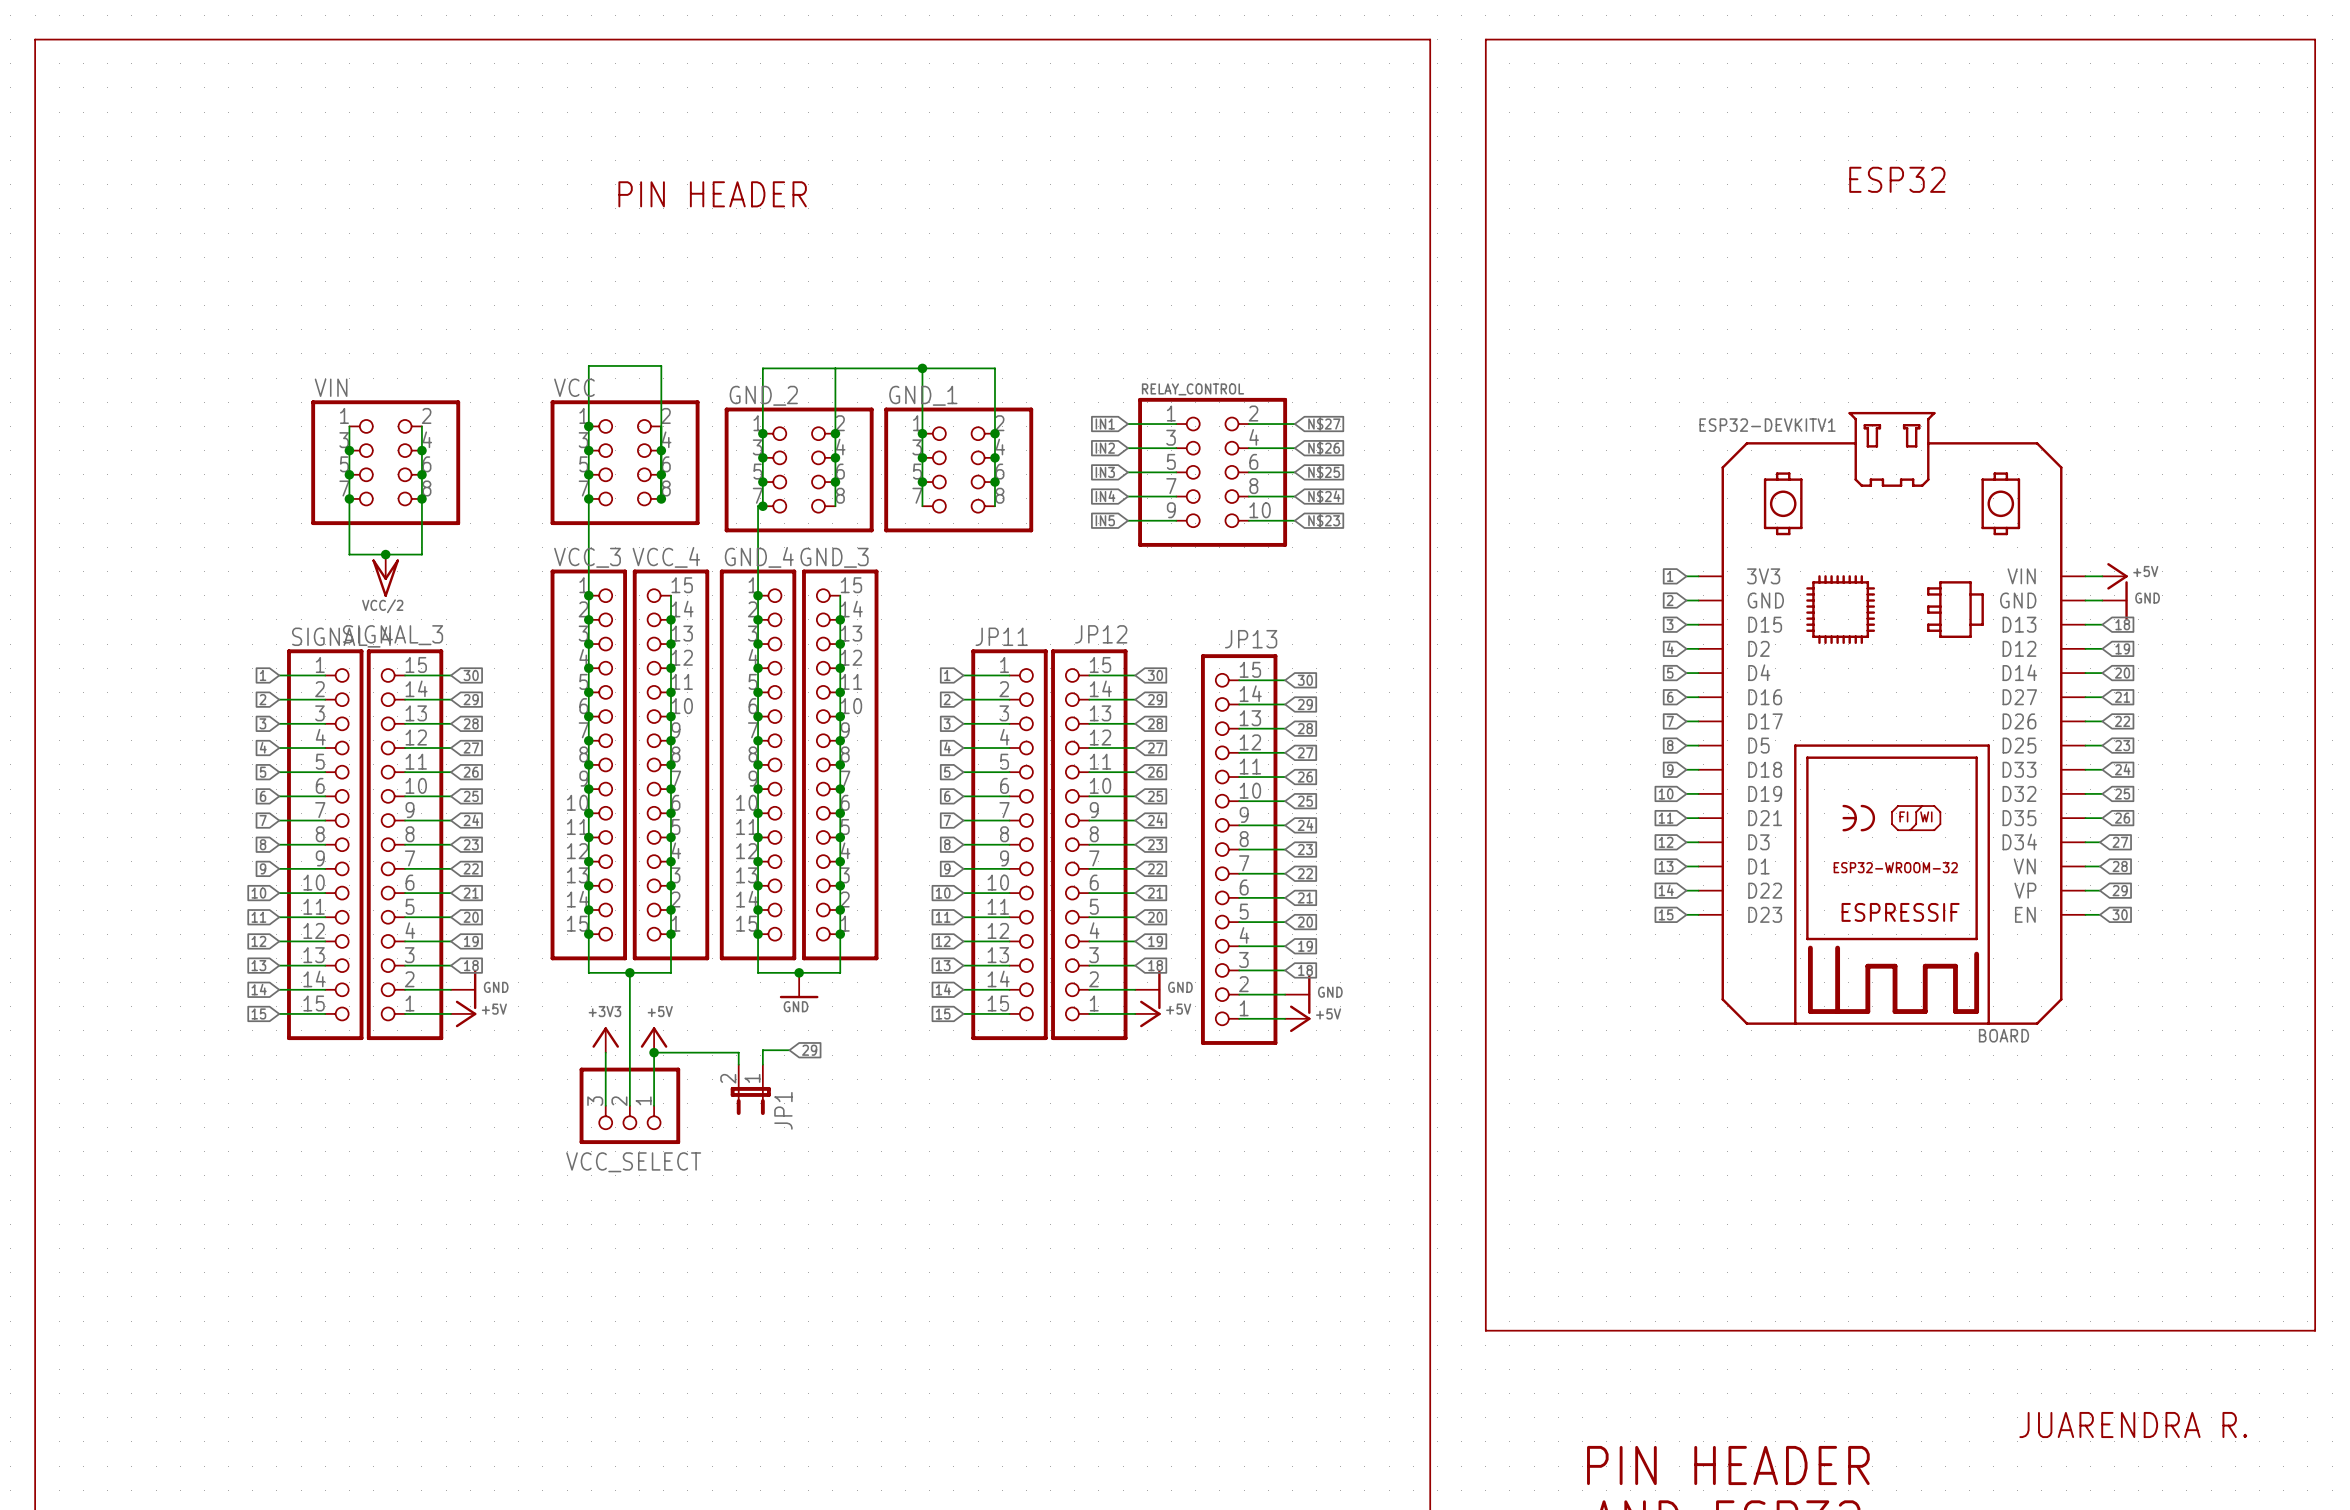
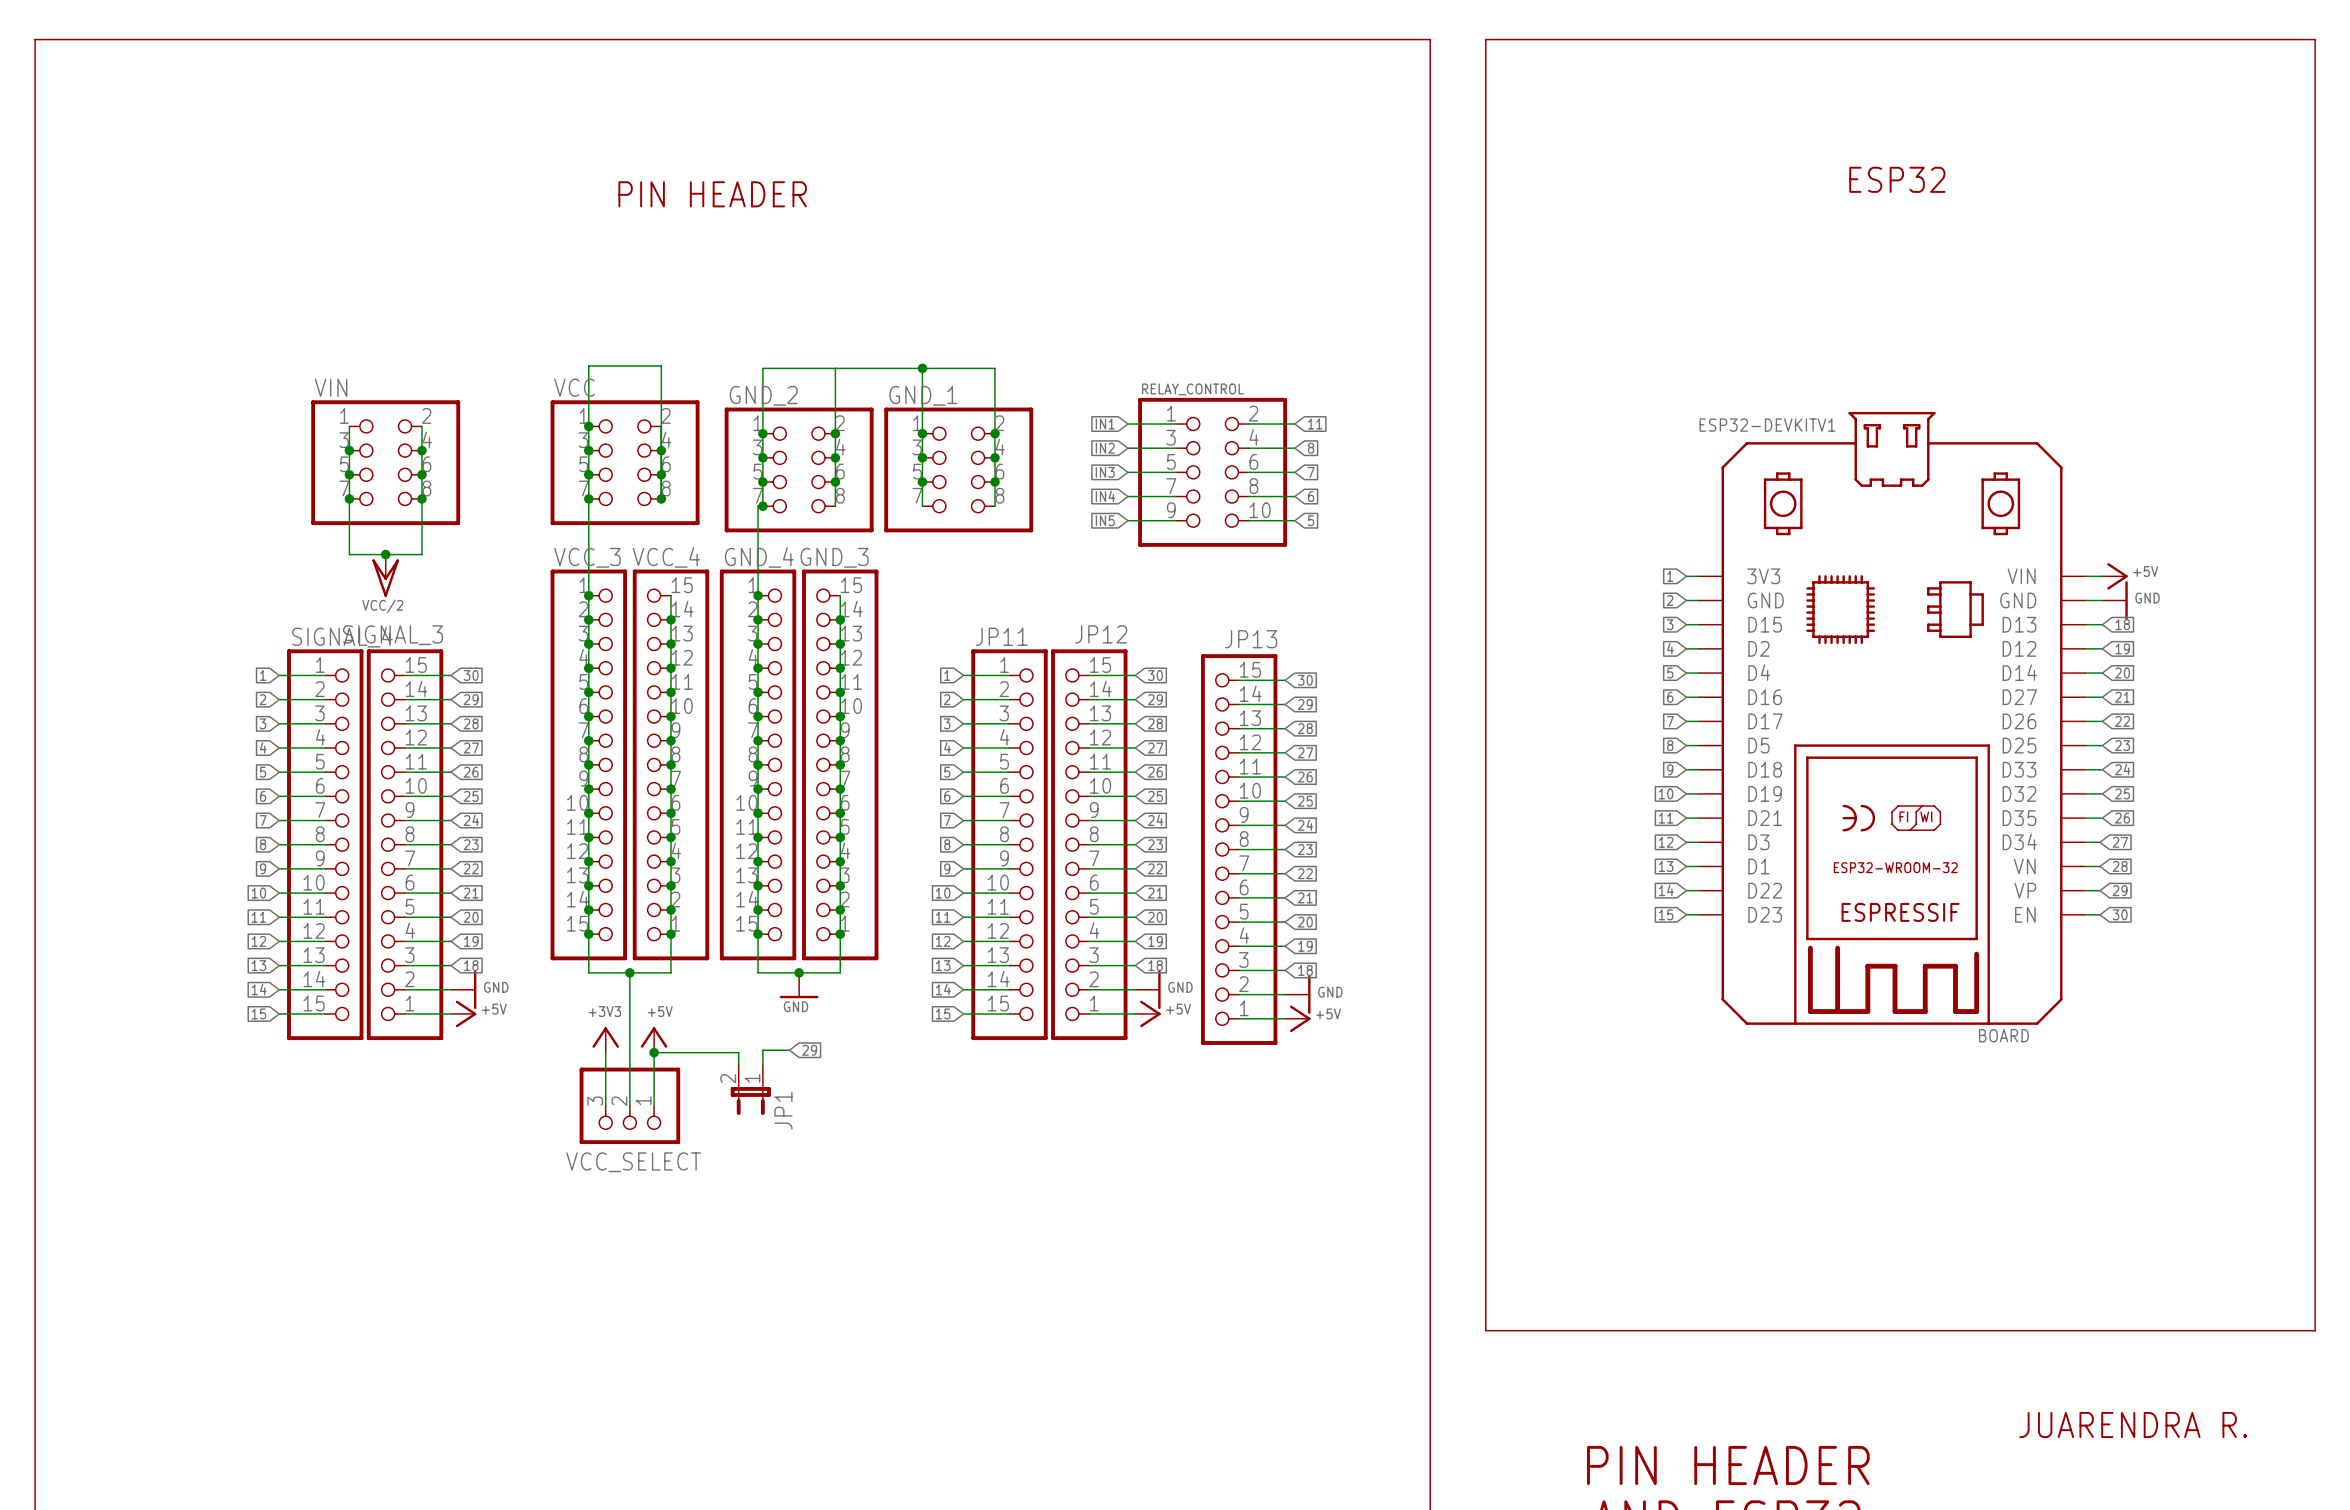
global label: N$27 (1324, 424) -> 11 (1315, 424)
global label: N$26 (1324, 448) -> 8 (1311, 448)
global label: N$25 (1324, 472) -> 7 (1311, 472)
global label: N$24 (1324, 496) -> 6 (1311, 496)
global label: N$23 (1324, 520) -> 5 (1311, 520)

